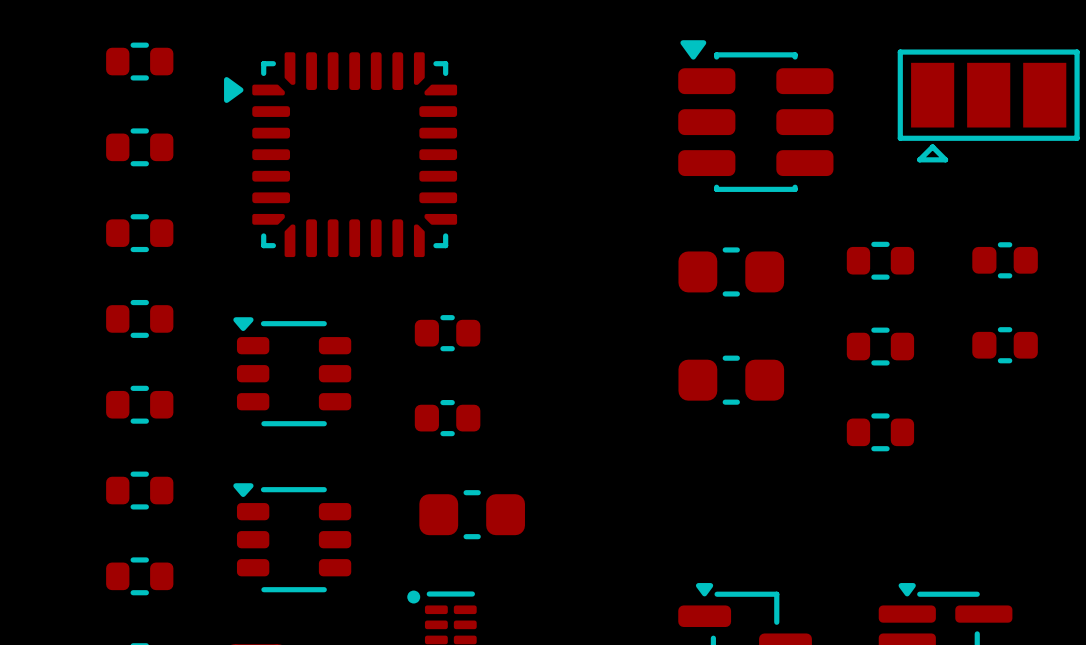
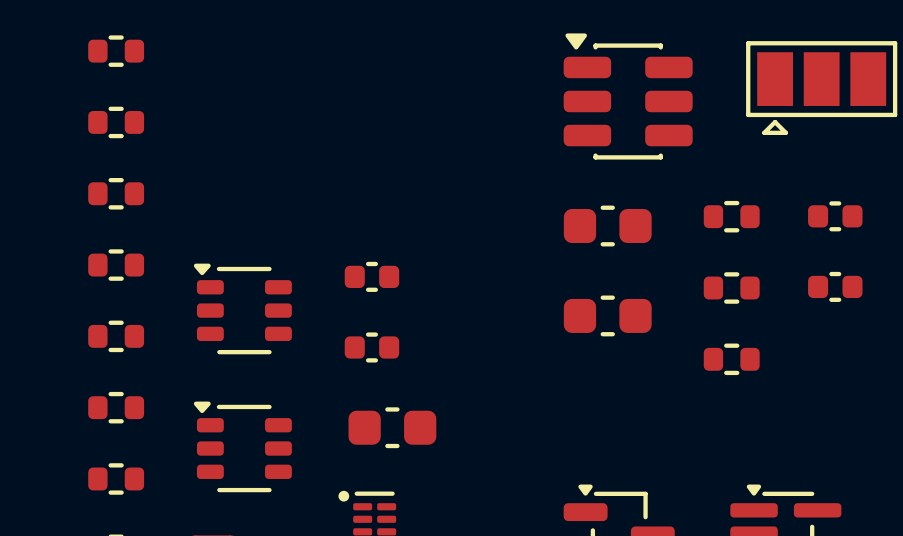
part: (340, 154) -> none

